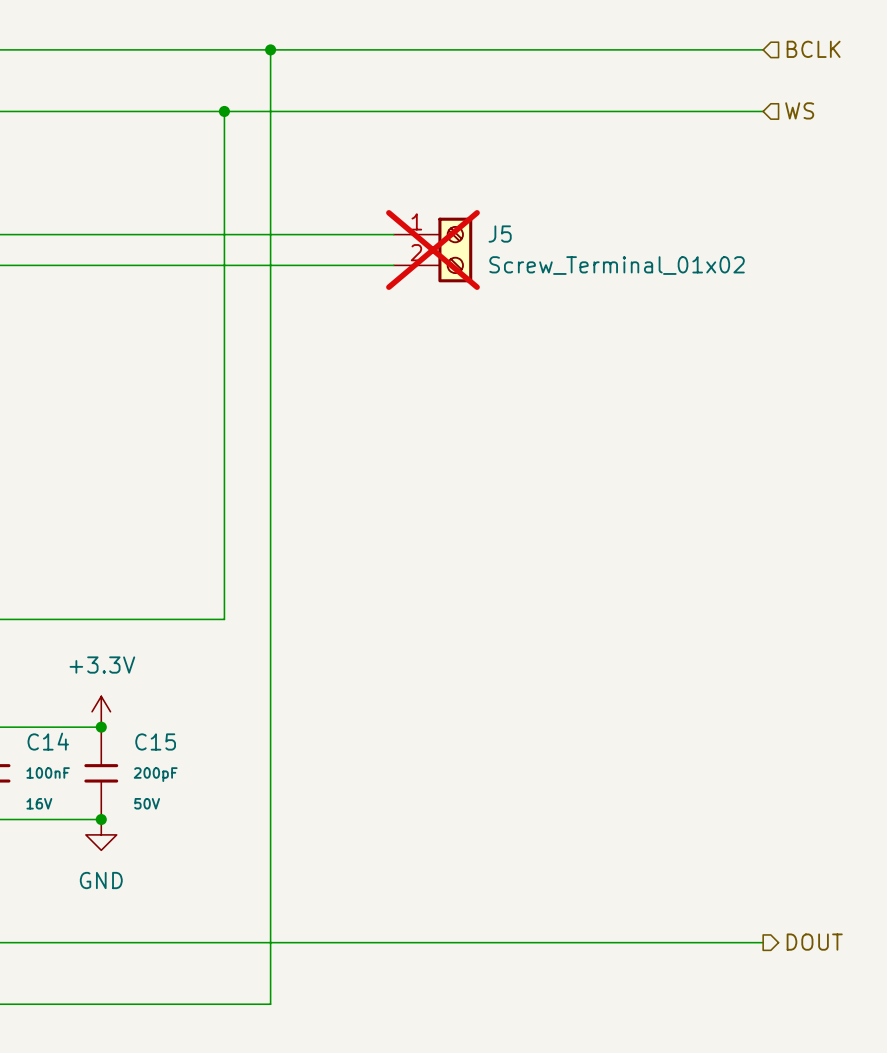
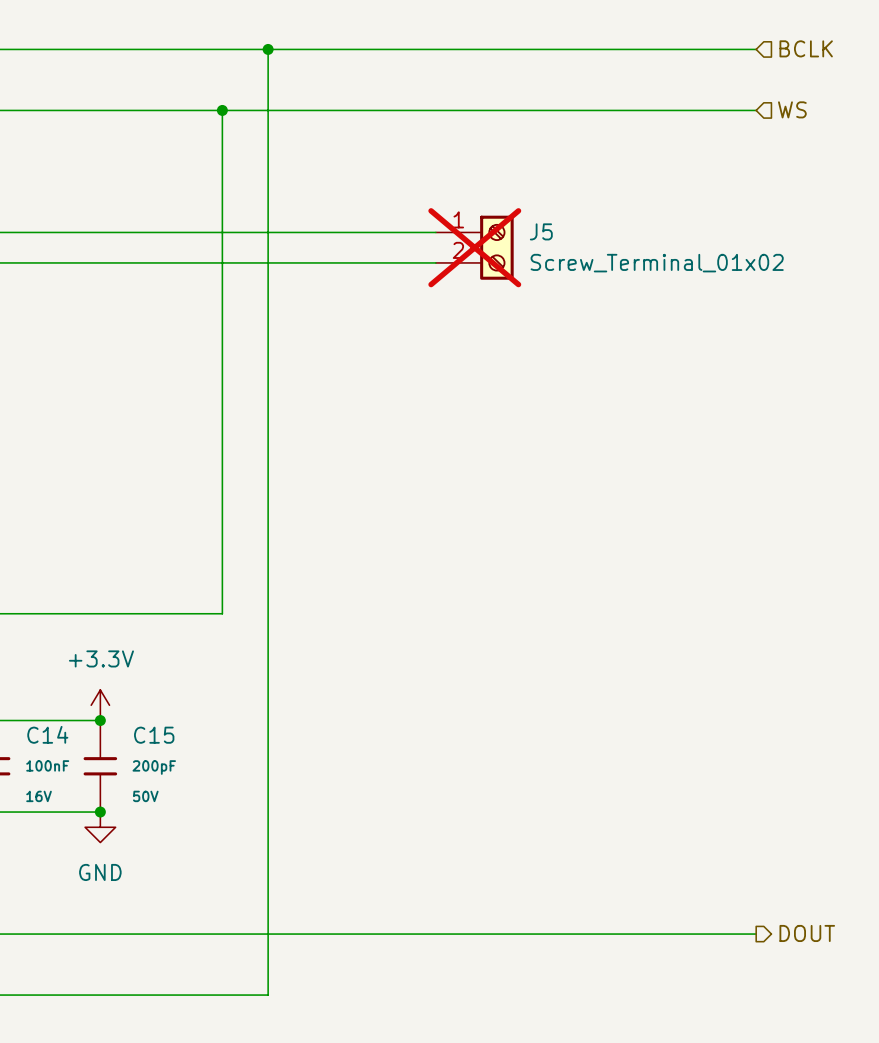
J5 position: (432, 250) -> (474, 247)

